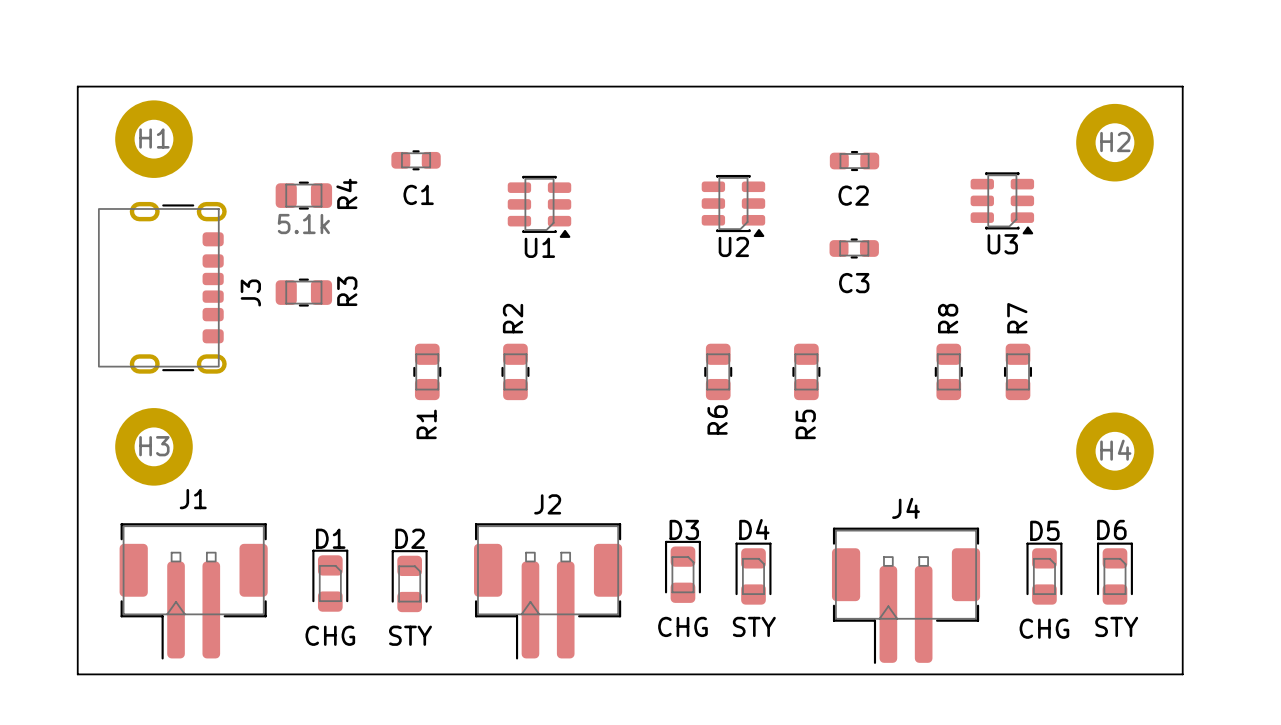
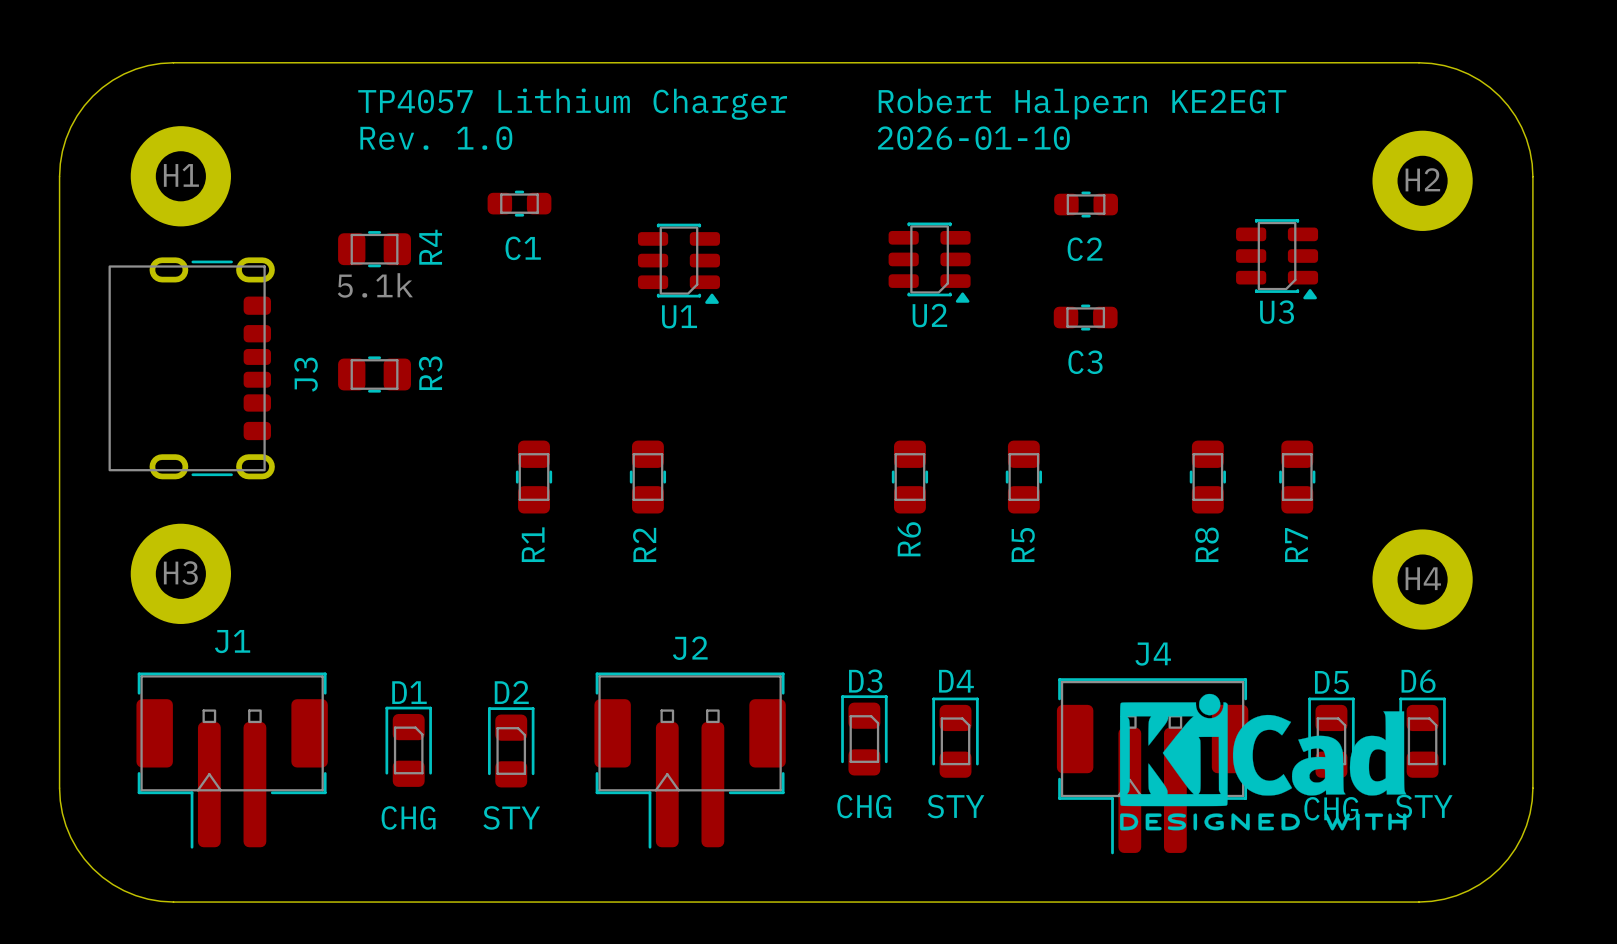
text: none -> TP4057 Lithium Charger (572, 104)
text: none -> Robert Halpern KE2EGT (1082, 104)
board edge: (77, 86) (1182, 86) (1182, 674) (77, 674) (77, 86) -> (173, 62) (135, 69) (102, 87) (84, 105) (70, 127) (60, 163) (60, 800) (65, 825) (77, 848) (92, 868) (112, 884) (148, 899) (173, 902) (1418, 902) (1444, 899) (1468, 890) (1499, 868) (1515, 848) (1526, 825) (1532, 788) (1532, 176) (1530, 151) (1521, 127) (1508, 105) (1479, 80) (1444, 65) (1418, 62) (173, 62)
text: none -> Rev. 1.0 (436, 138)
text: none -> 2026-01-10 (973, 138)
R2 name position: R2 (513, 318) -> R2 (644, 544)
R8 name position: R8 (948, 318) -> R8 (1207, 544)
R7 name position: R7 (1017, 318) -> R7 (1296, 545)
drawing: none -> [1119, 693, 1407, 831]

